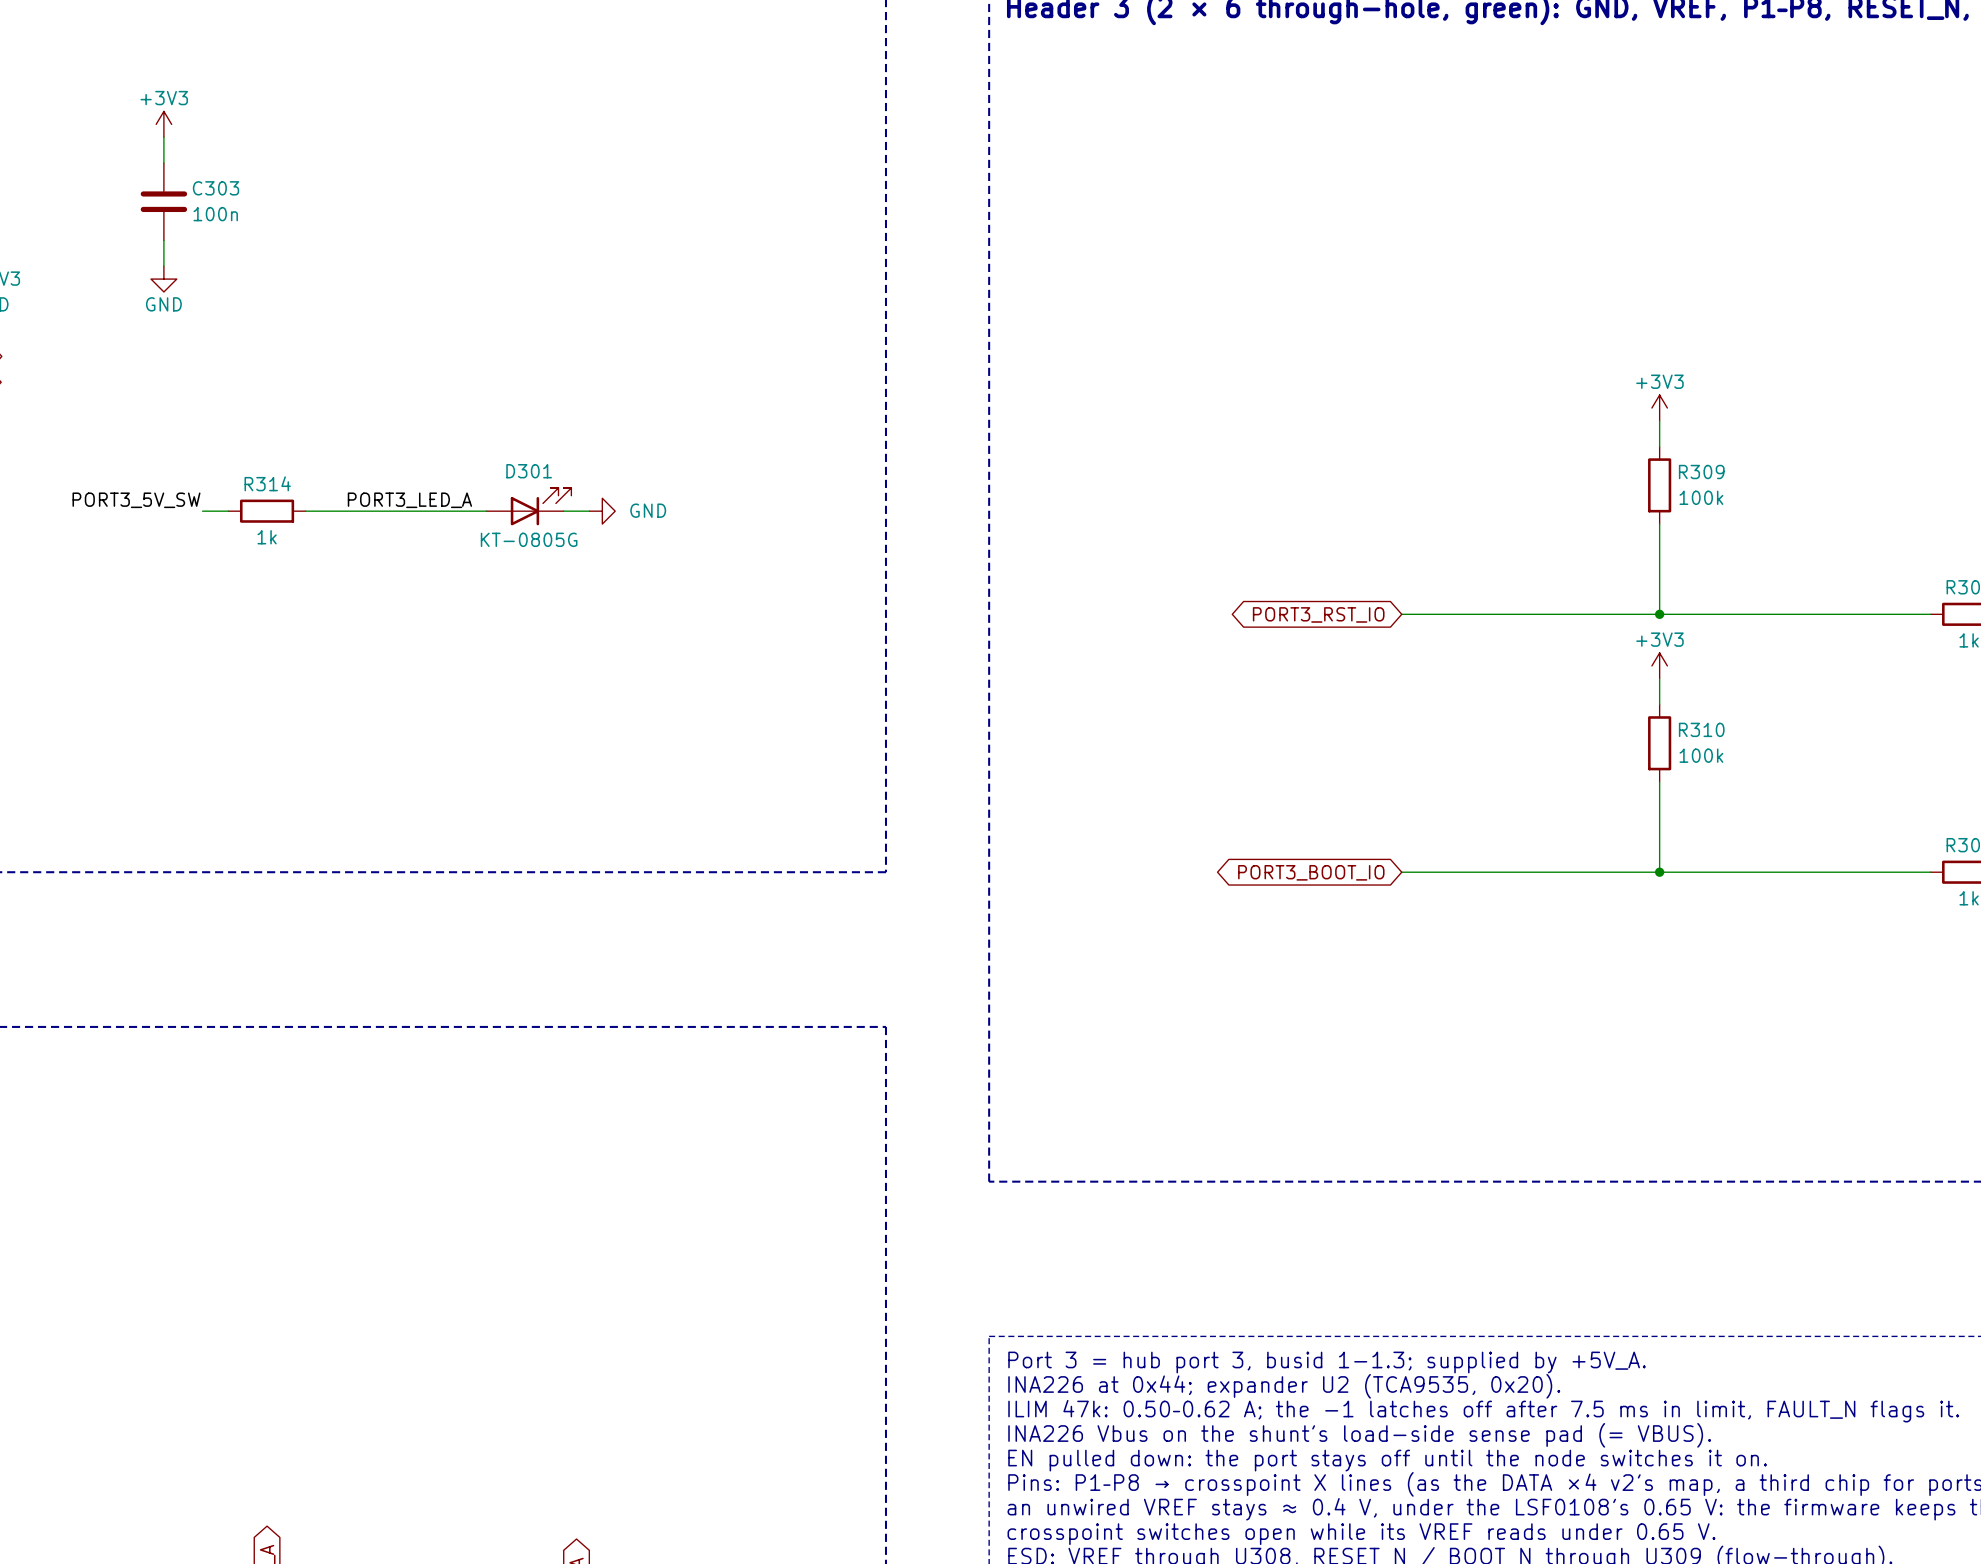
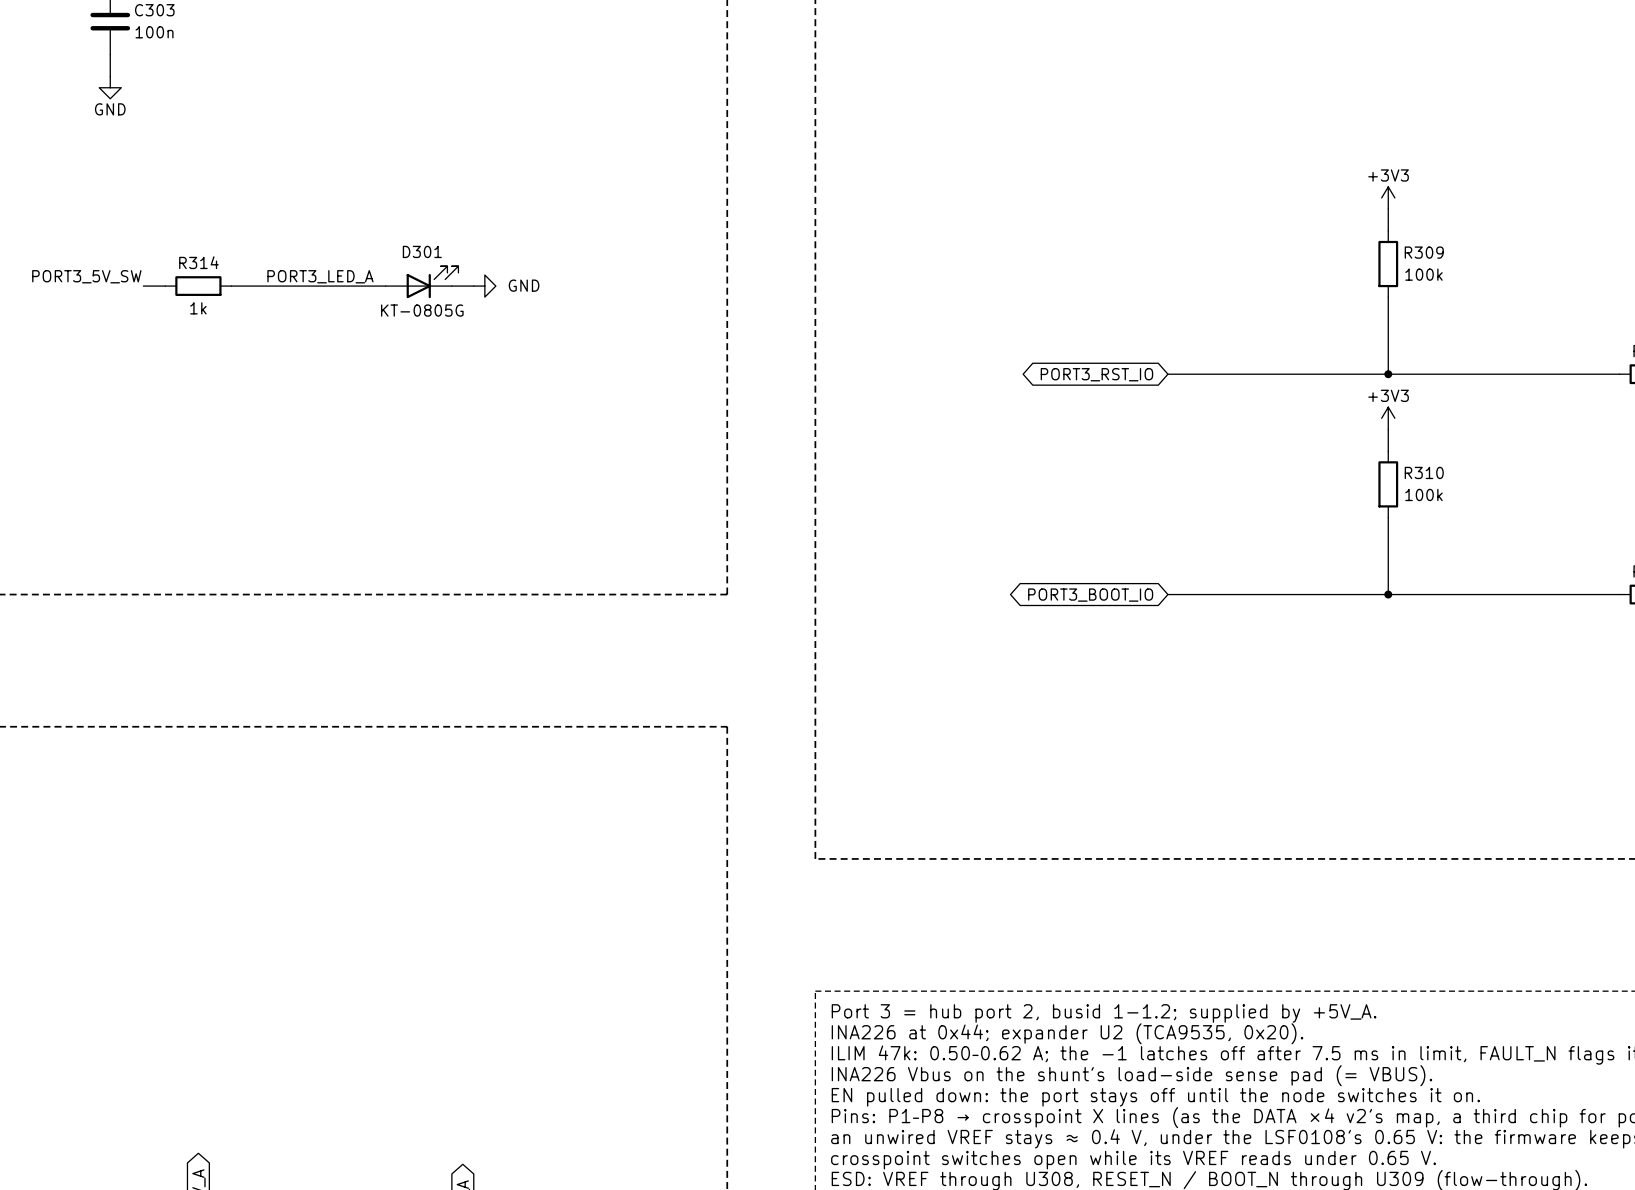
text: Port 3 = hub port 3, busid 1-1.3; supplied by +5V_A. (1327, 1362) -> Port 3 = hub port 2, busid 1-1.2; supplied by +5V_A. (1104, 1013)

